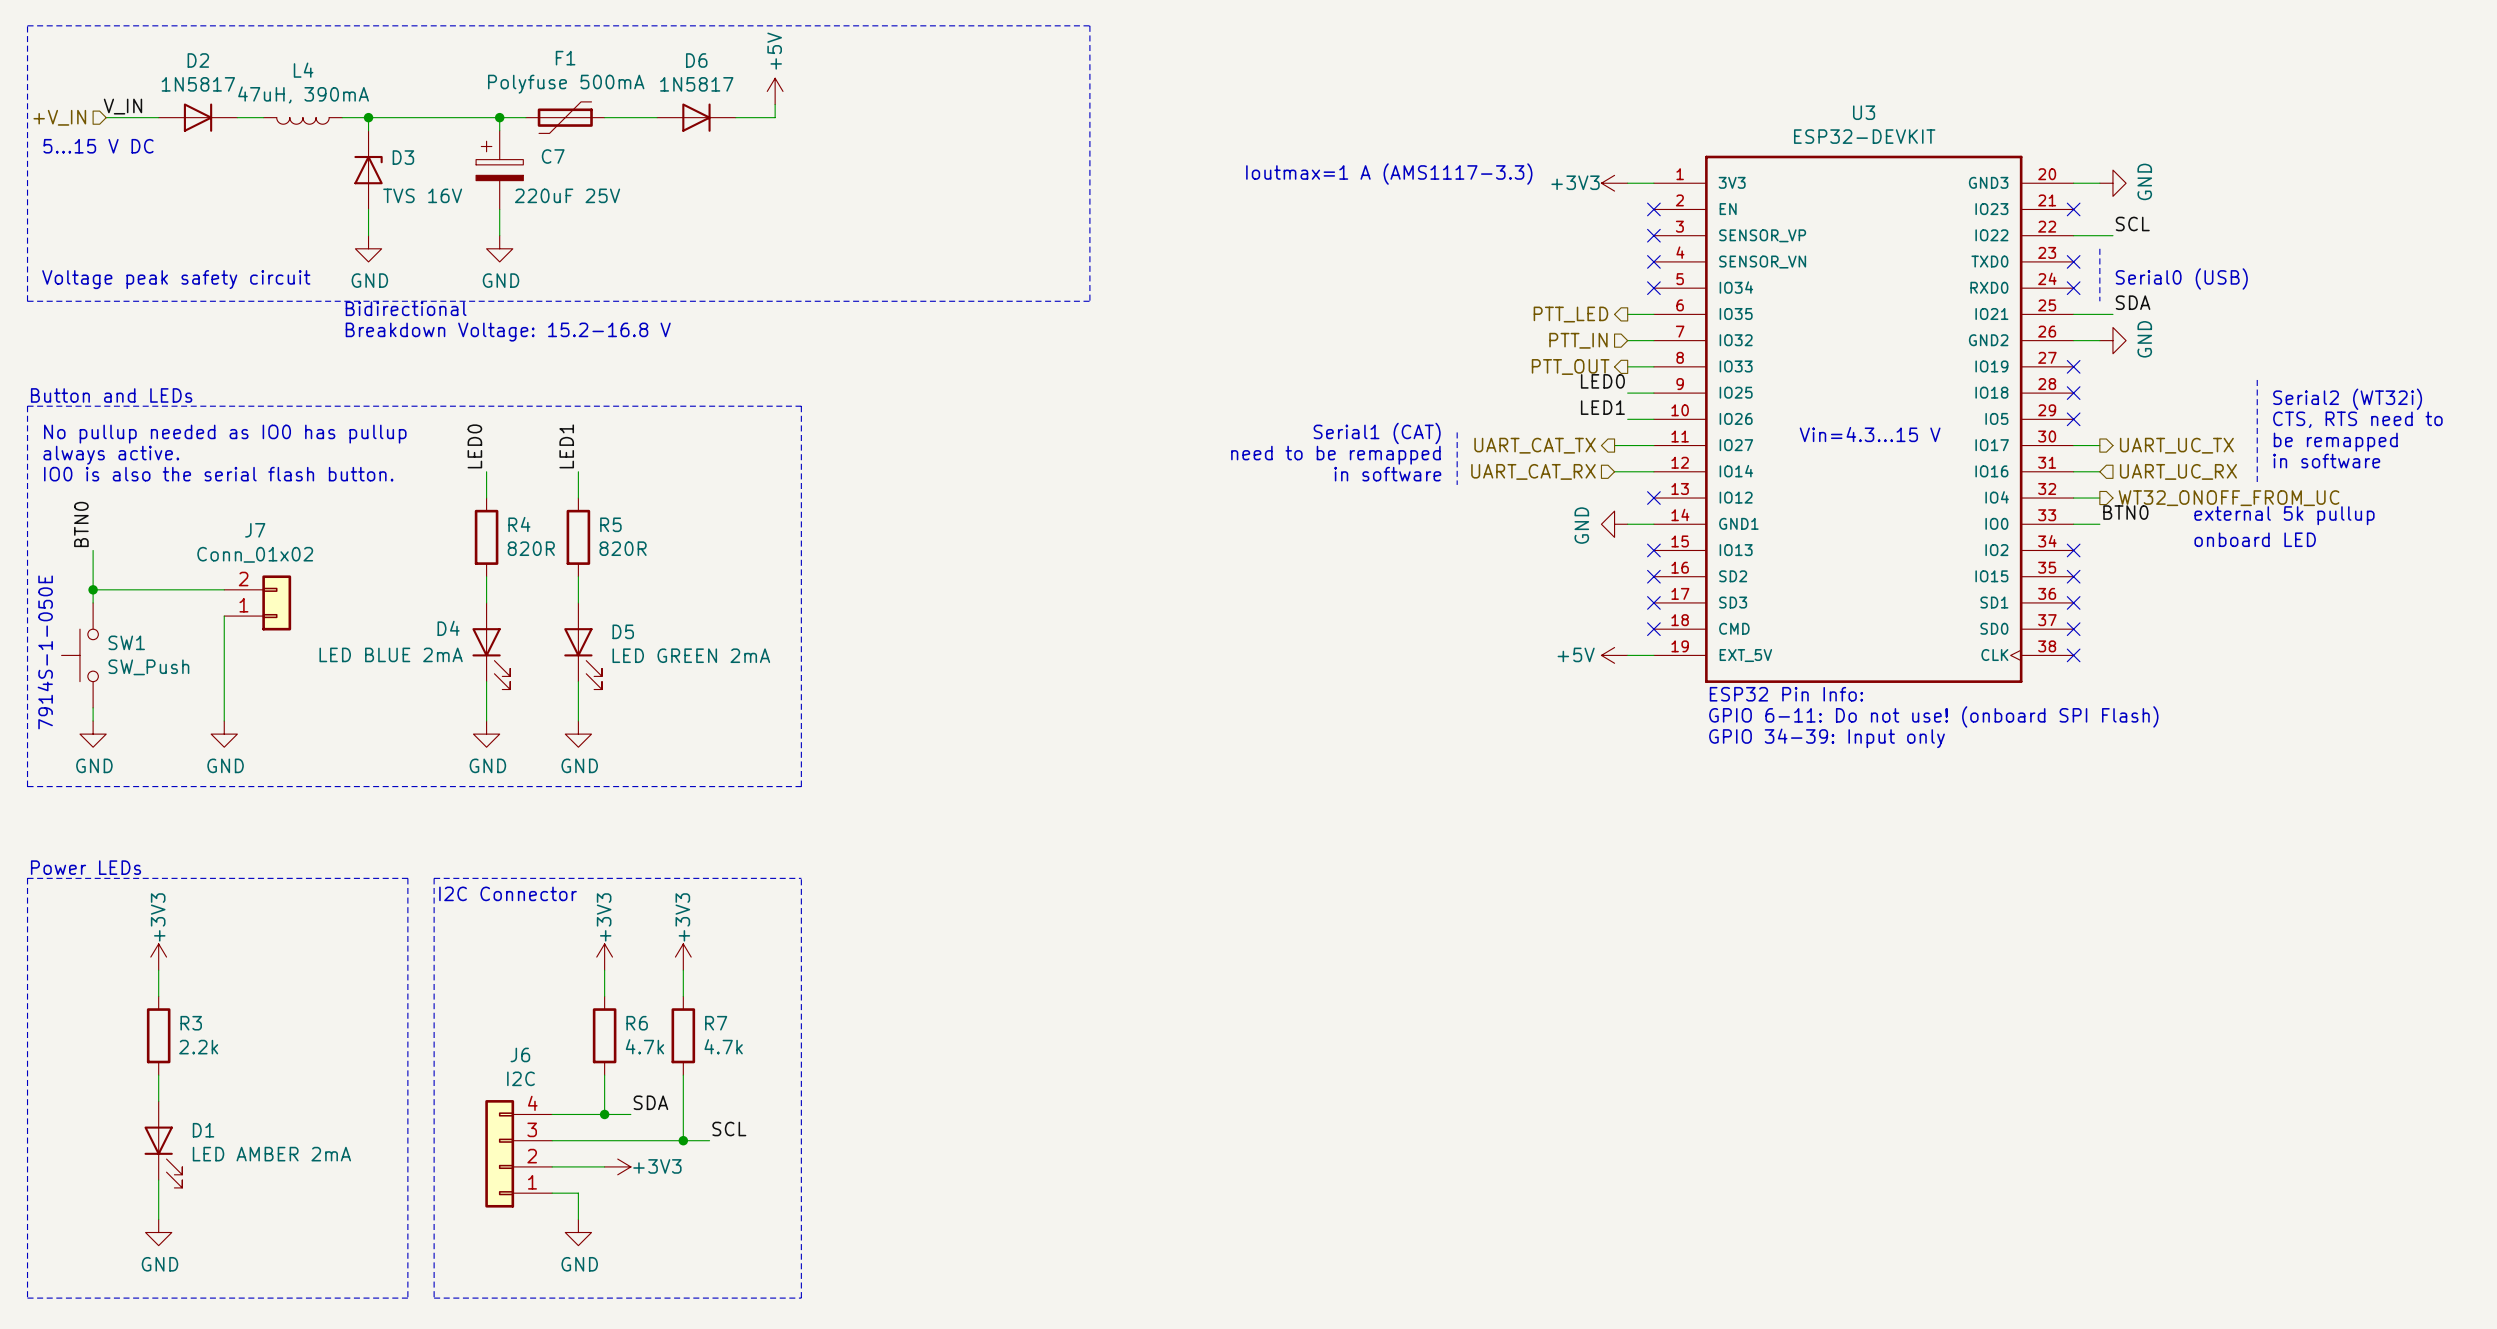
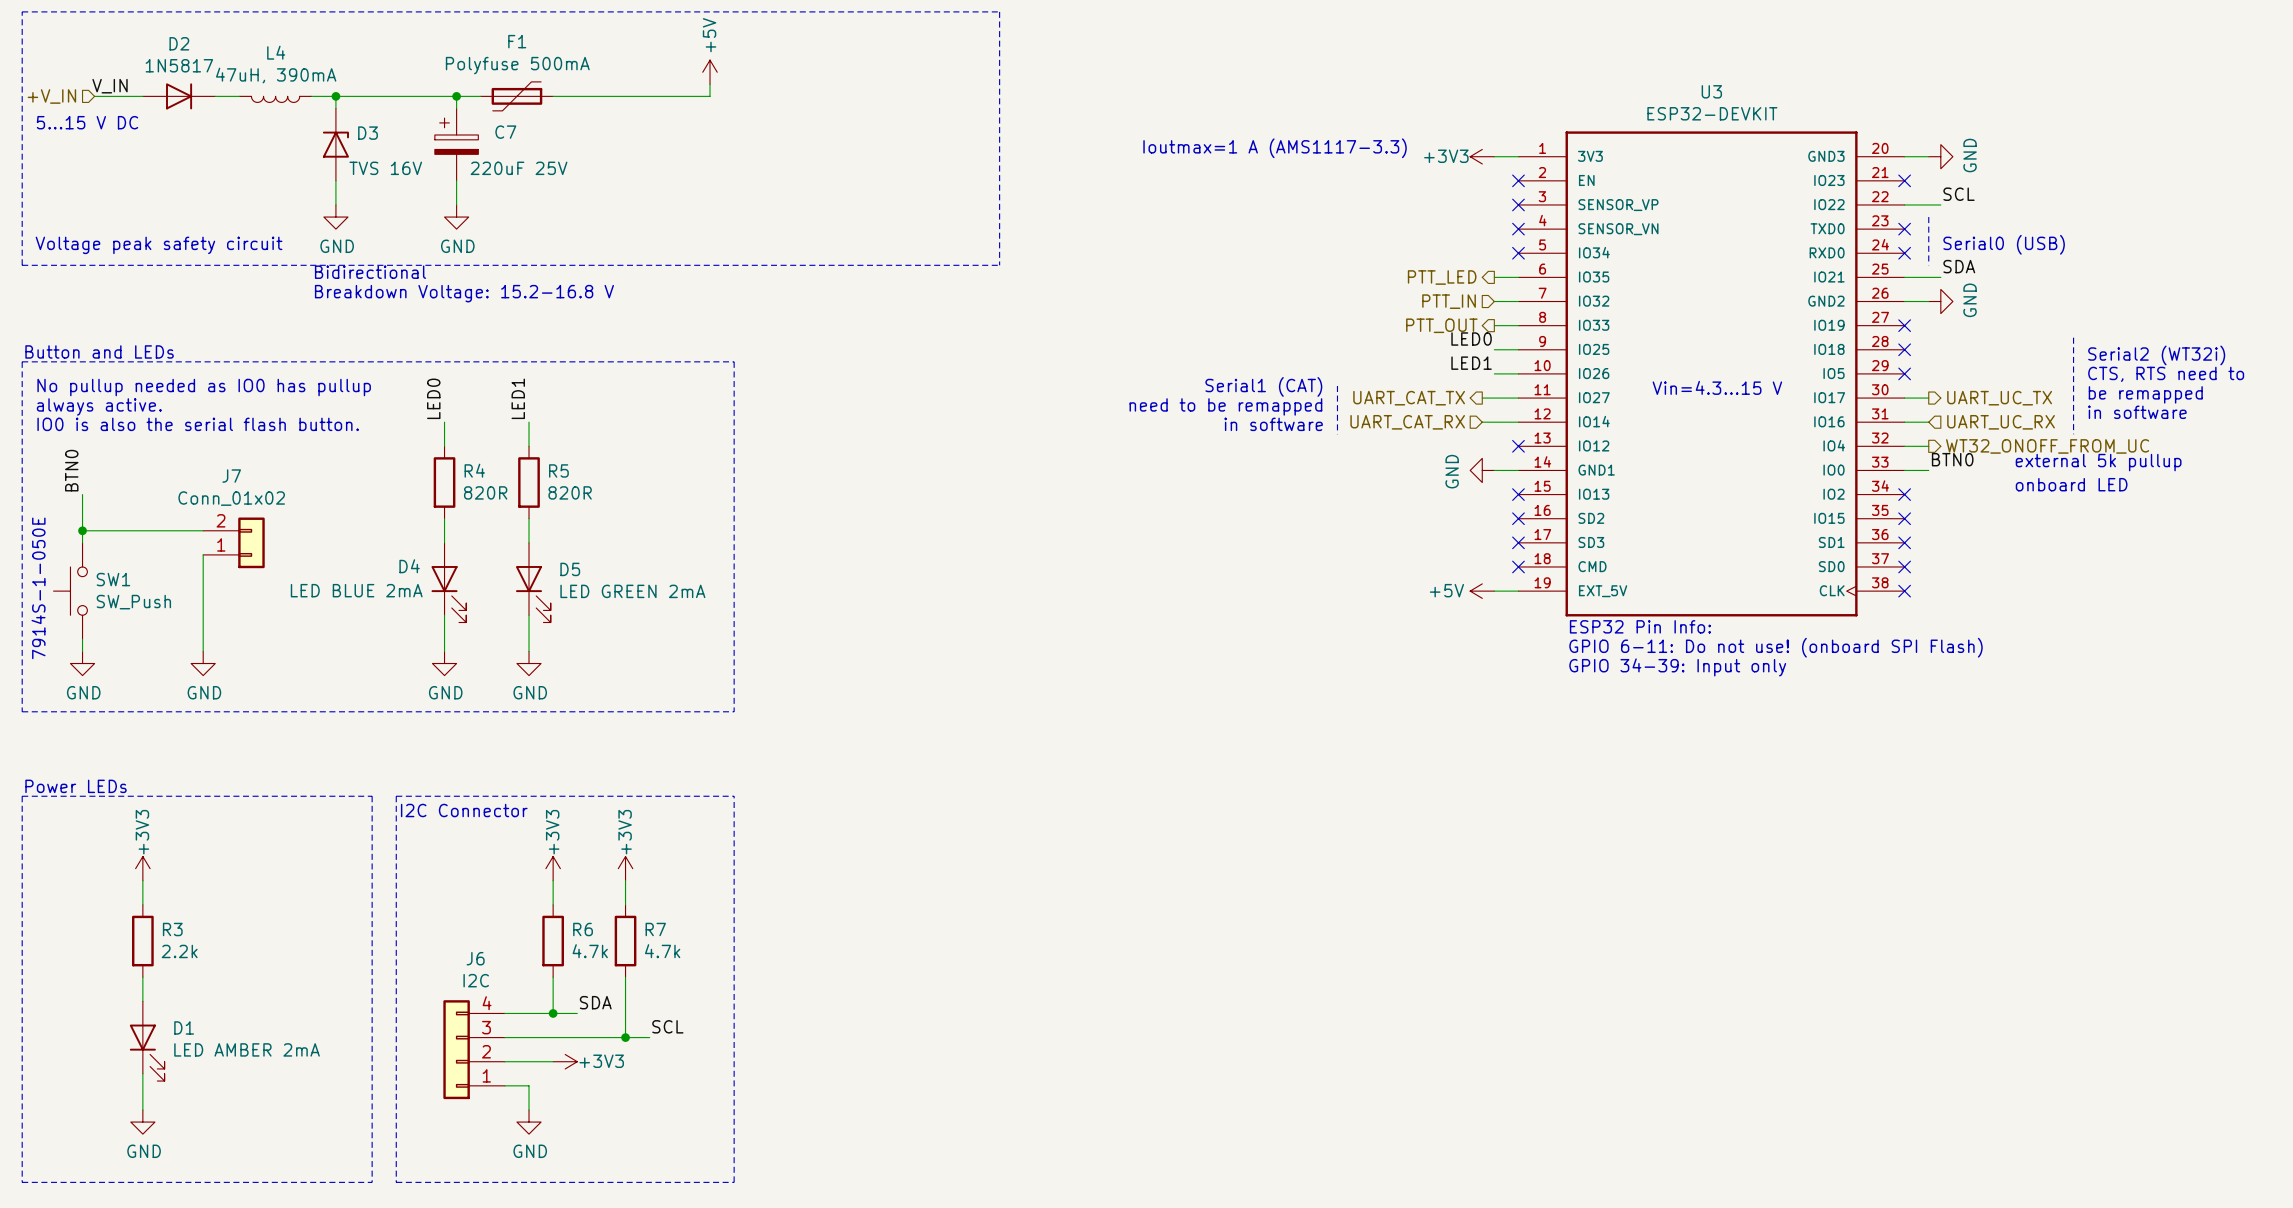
D6: 1N5817 (696, 117) -> none

